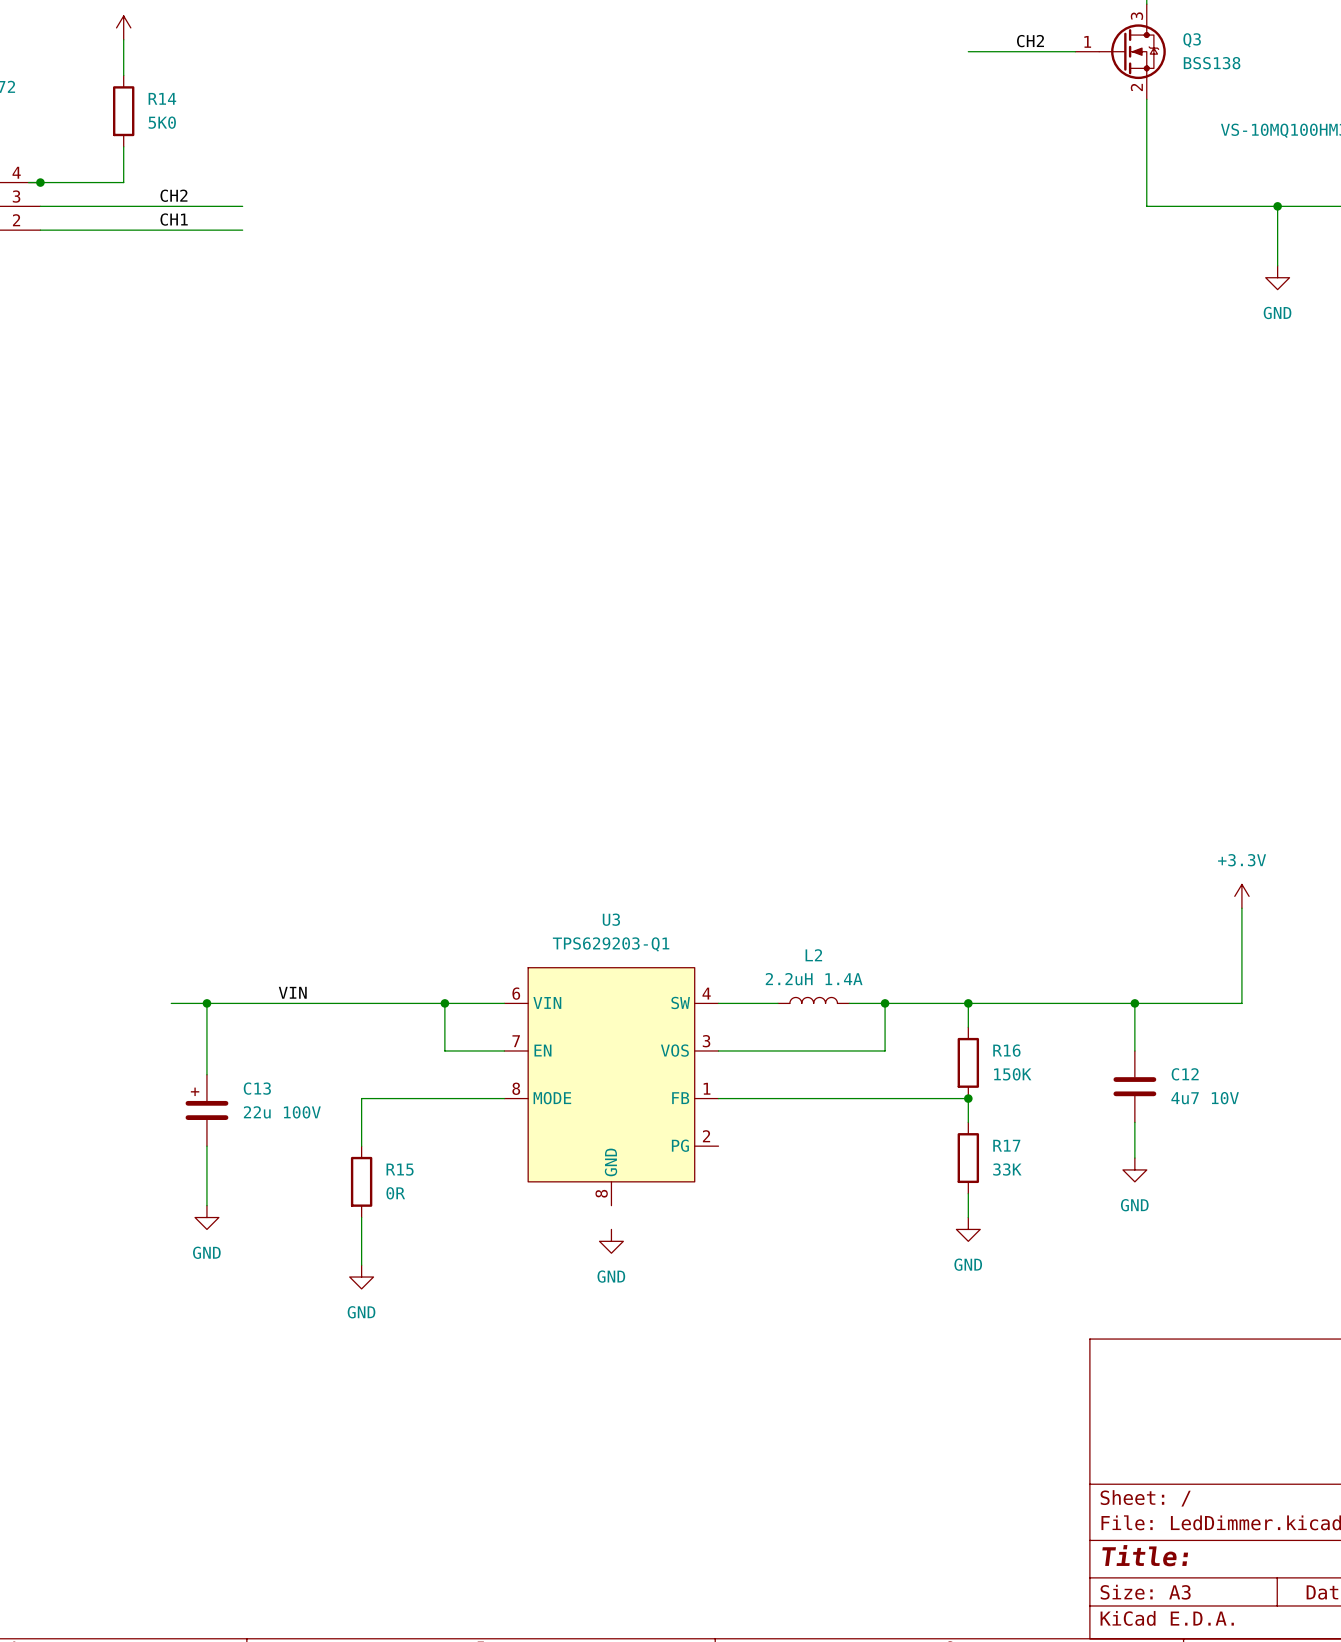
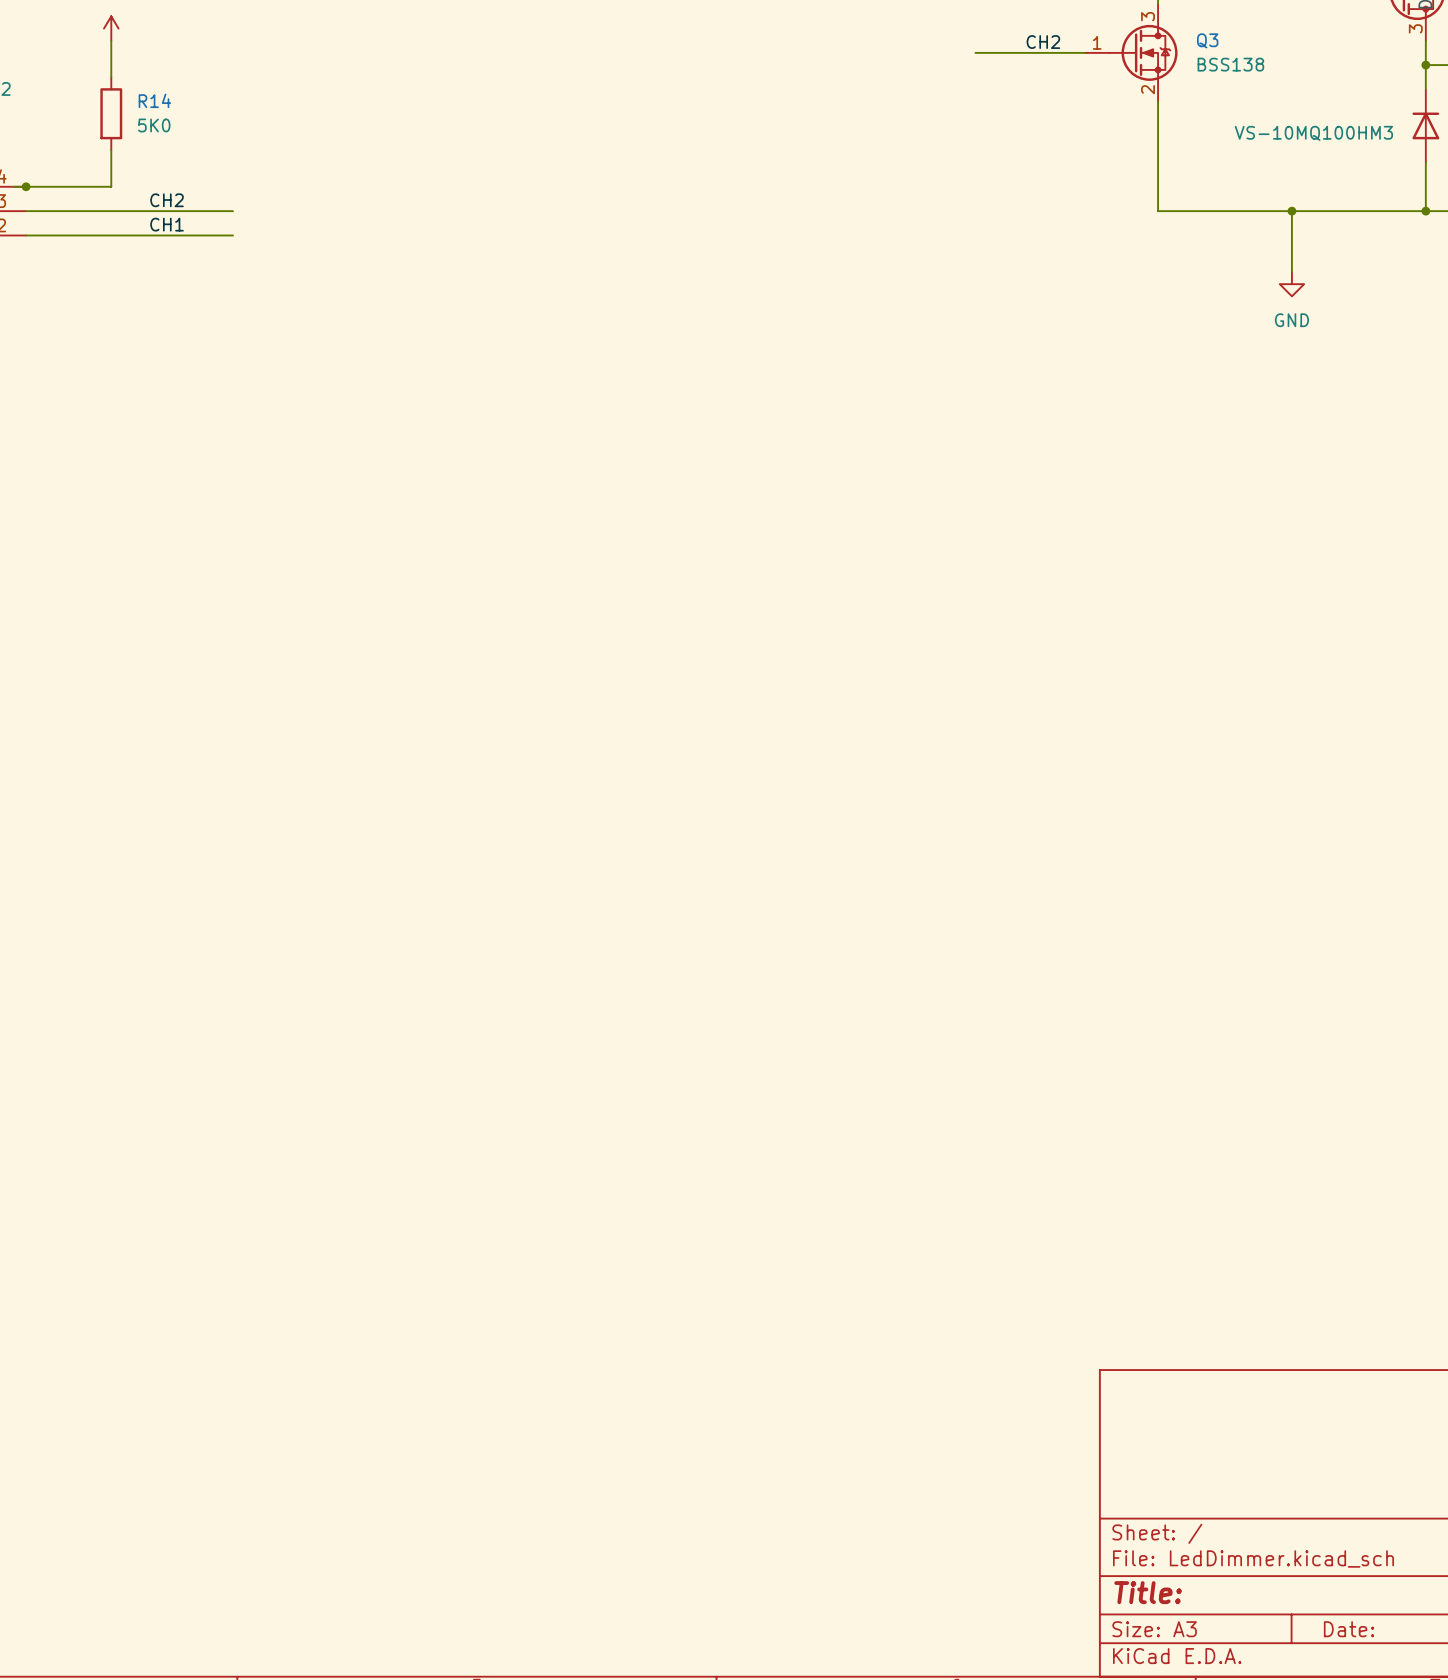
power symbol: +3.3V (1241, 896) -> none
wire: (1241, 908) (1241, 1003) (849, 1003) -> none
label: VIN (292, 992) -> none
L2: 2.2uH 1.4A (813, 1000) -> none
wire: (171, 1003) (504, 1003) -> none
wire: (206, 1003) (206, 1074) -> none
junction: (206, 1003) -> none
wire: (444, 1003) (444, 1050) (504, 1050) -> none
junction: (444, 1003) -> none
wire: (718, 1003) (777, 1003) -> none
wire: (885, 1003) (885, 1050) (718, 1050) -> none
junction: (885, 1003) -> none
wire: (968, 1003) (968, 1027) -> none
junction: (968, 1003) -> none
wire: (1134, 1003) (1134, 1050) -> none
junction: (1134, 1003) -> none
R16: 150K (968, 1062) -> none
U3: TPS629203-Q1 (611, 1086) -> none
C12: 4u7 10V (1134, 1086) -> none
wire: (504, 1098) (361, 1098) (361, 1146) -> none
wire: (718, 1098) (968, 1098) (968, 1122) -> none
junction: (968, 1098) -> none
C13: 22u 100V (206, 1110) -> none
wire: (1134, 1122) (1134, 1158) -> none
wire: (206, 1146) (206, 1205) -> none
R17: 33K (968, 1158) -> none
power symbol: GND (1134, 1169) -> none
R15: 0R (361, 1181) -> none
wire: (968, 1193) (968, 1217) -> none
power symbol: GND (206, 1217) -> none
wire: (361, 1217) (361, 1265) -> none
power symbol: GND (968, 1229) -> none
power symbol: GND (611, 1241) -> none
power symbol: GND (361, 1277) -> none

